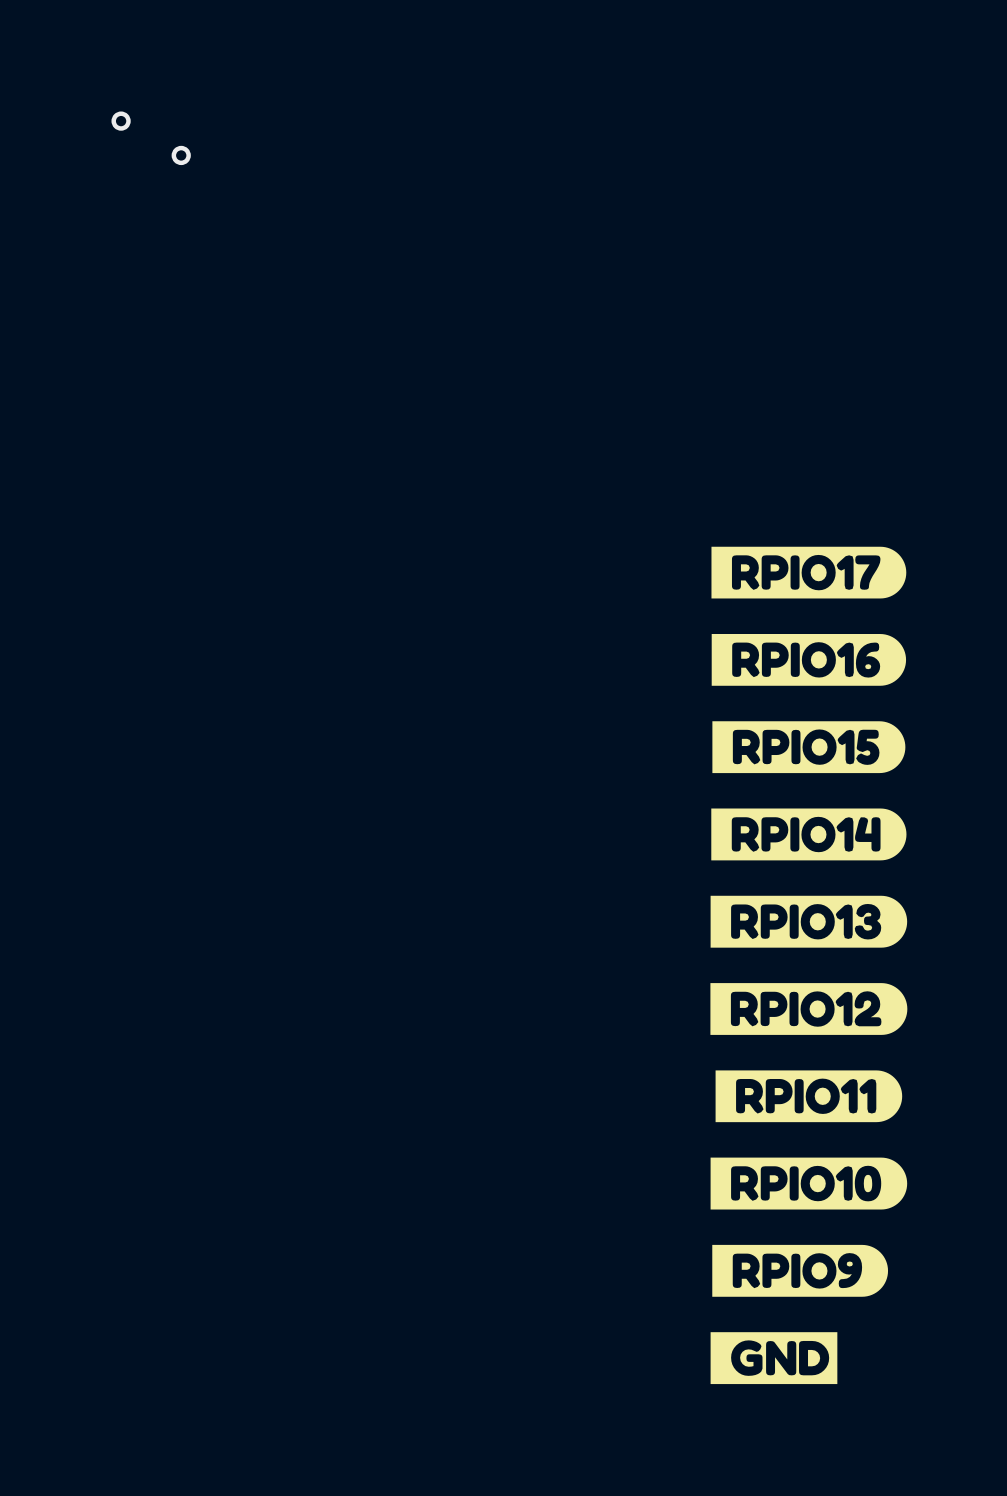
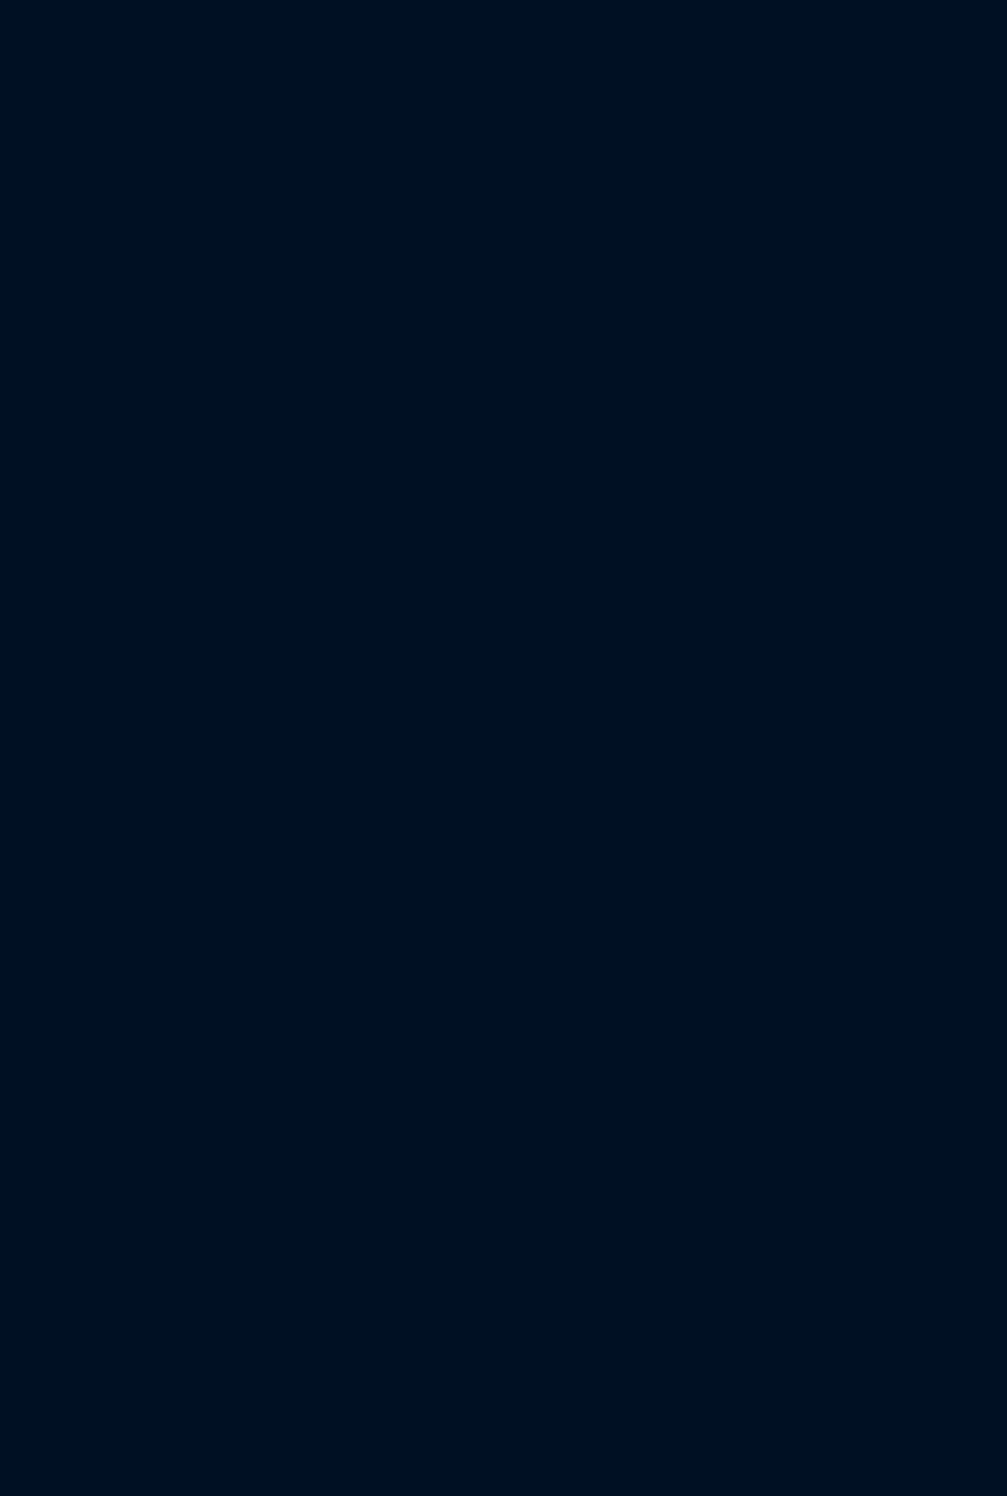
via: (121, 121) -> none
via: (181, 155) -> none
drawing: [710, 546, 908, 1385] -> none

